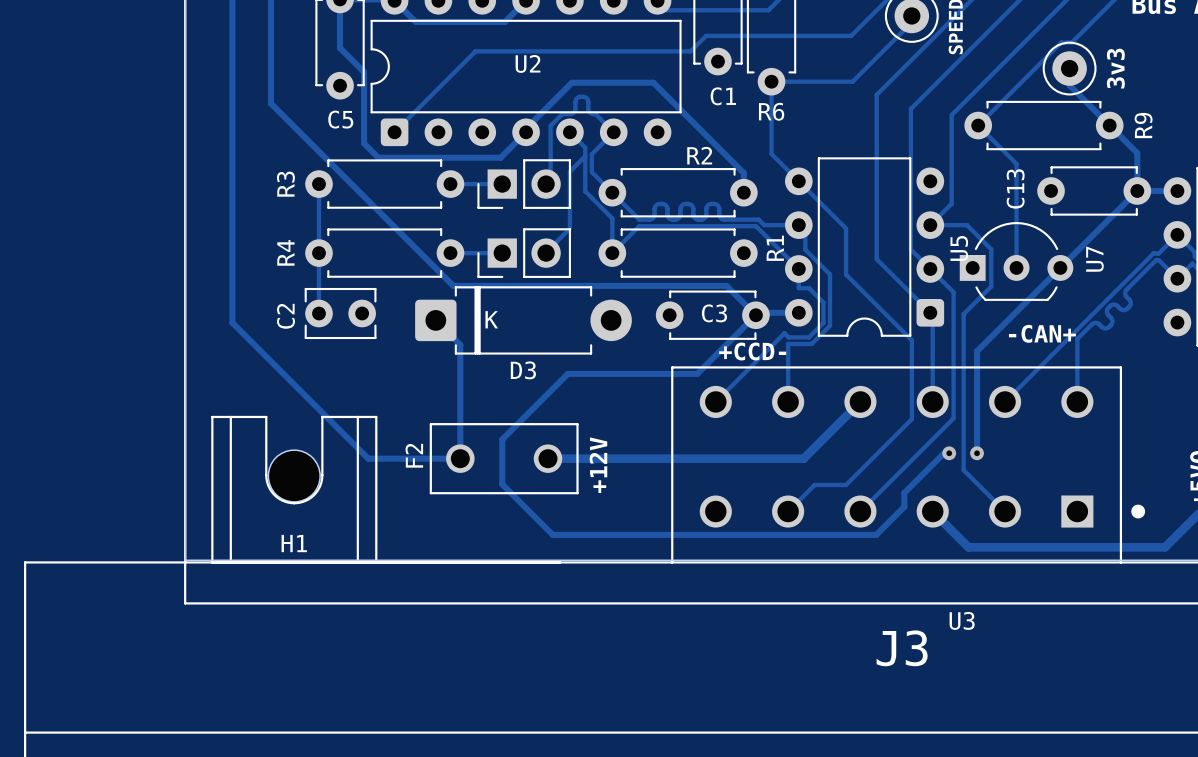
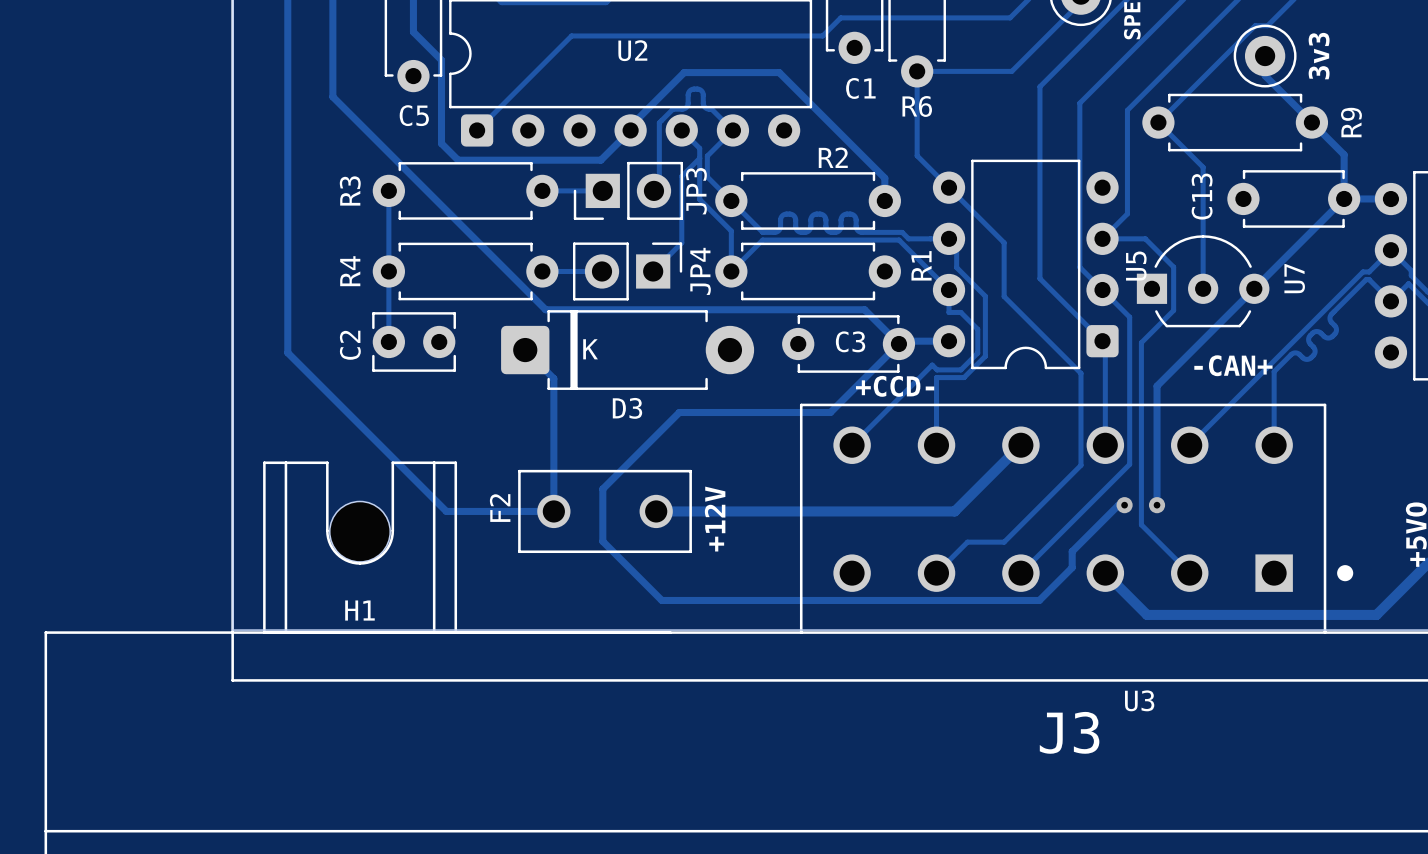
JP3 name: none -> JP3 (696, 191)
JP4: none -> (627, 271)
part: (524, 253) -> none

